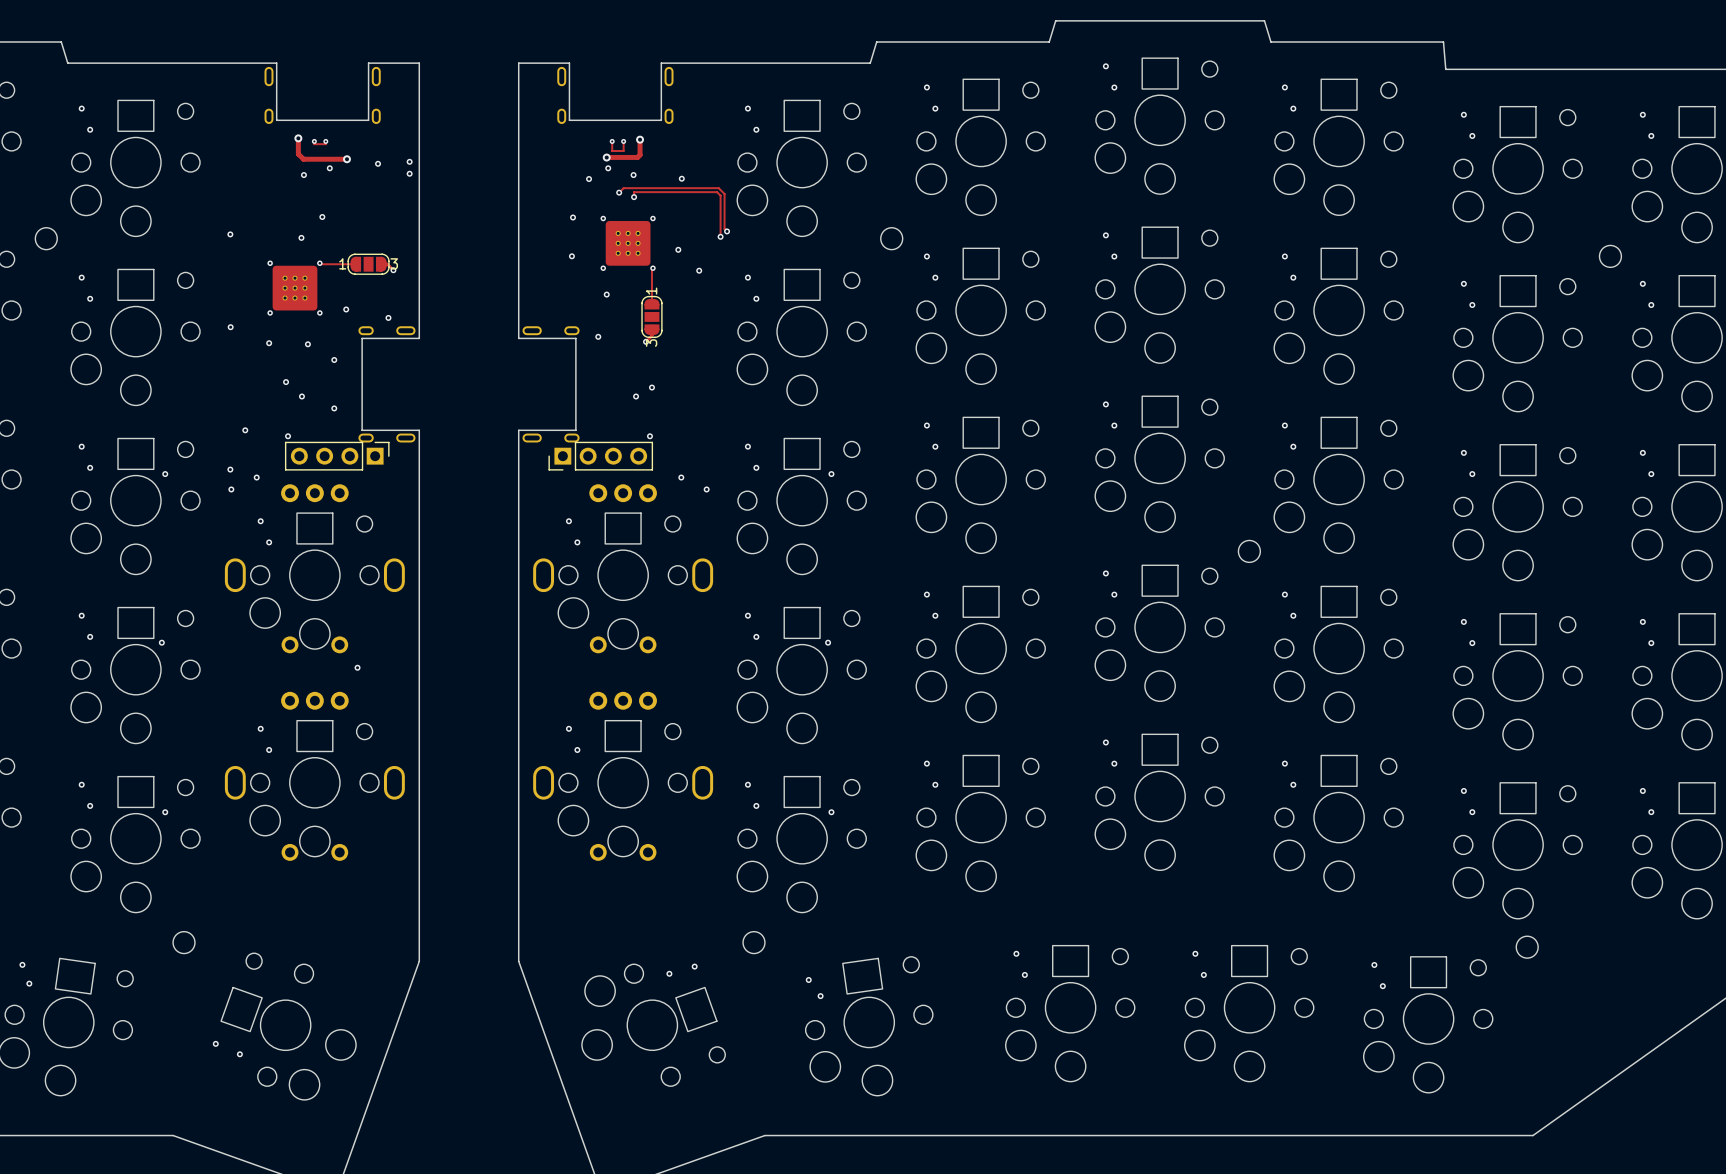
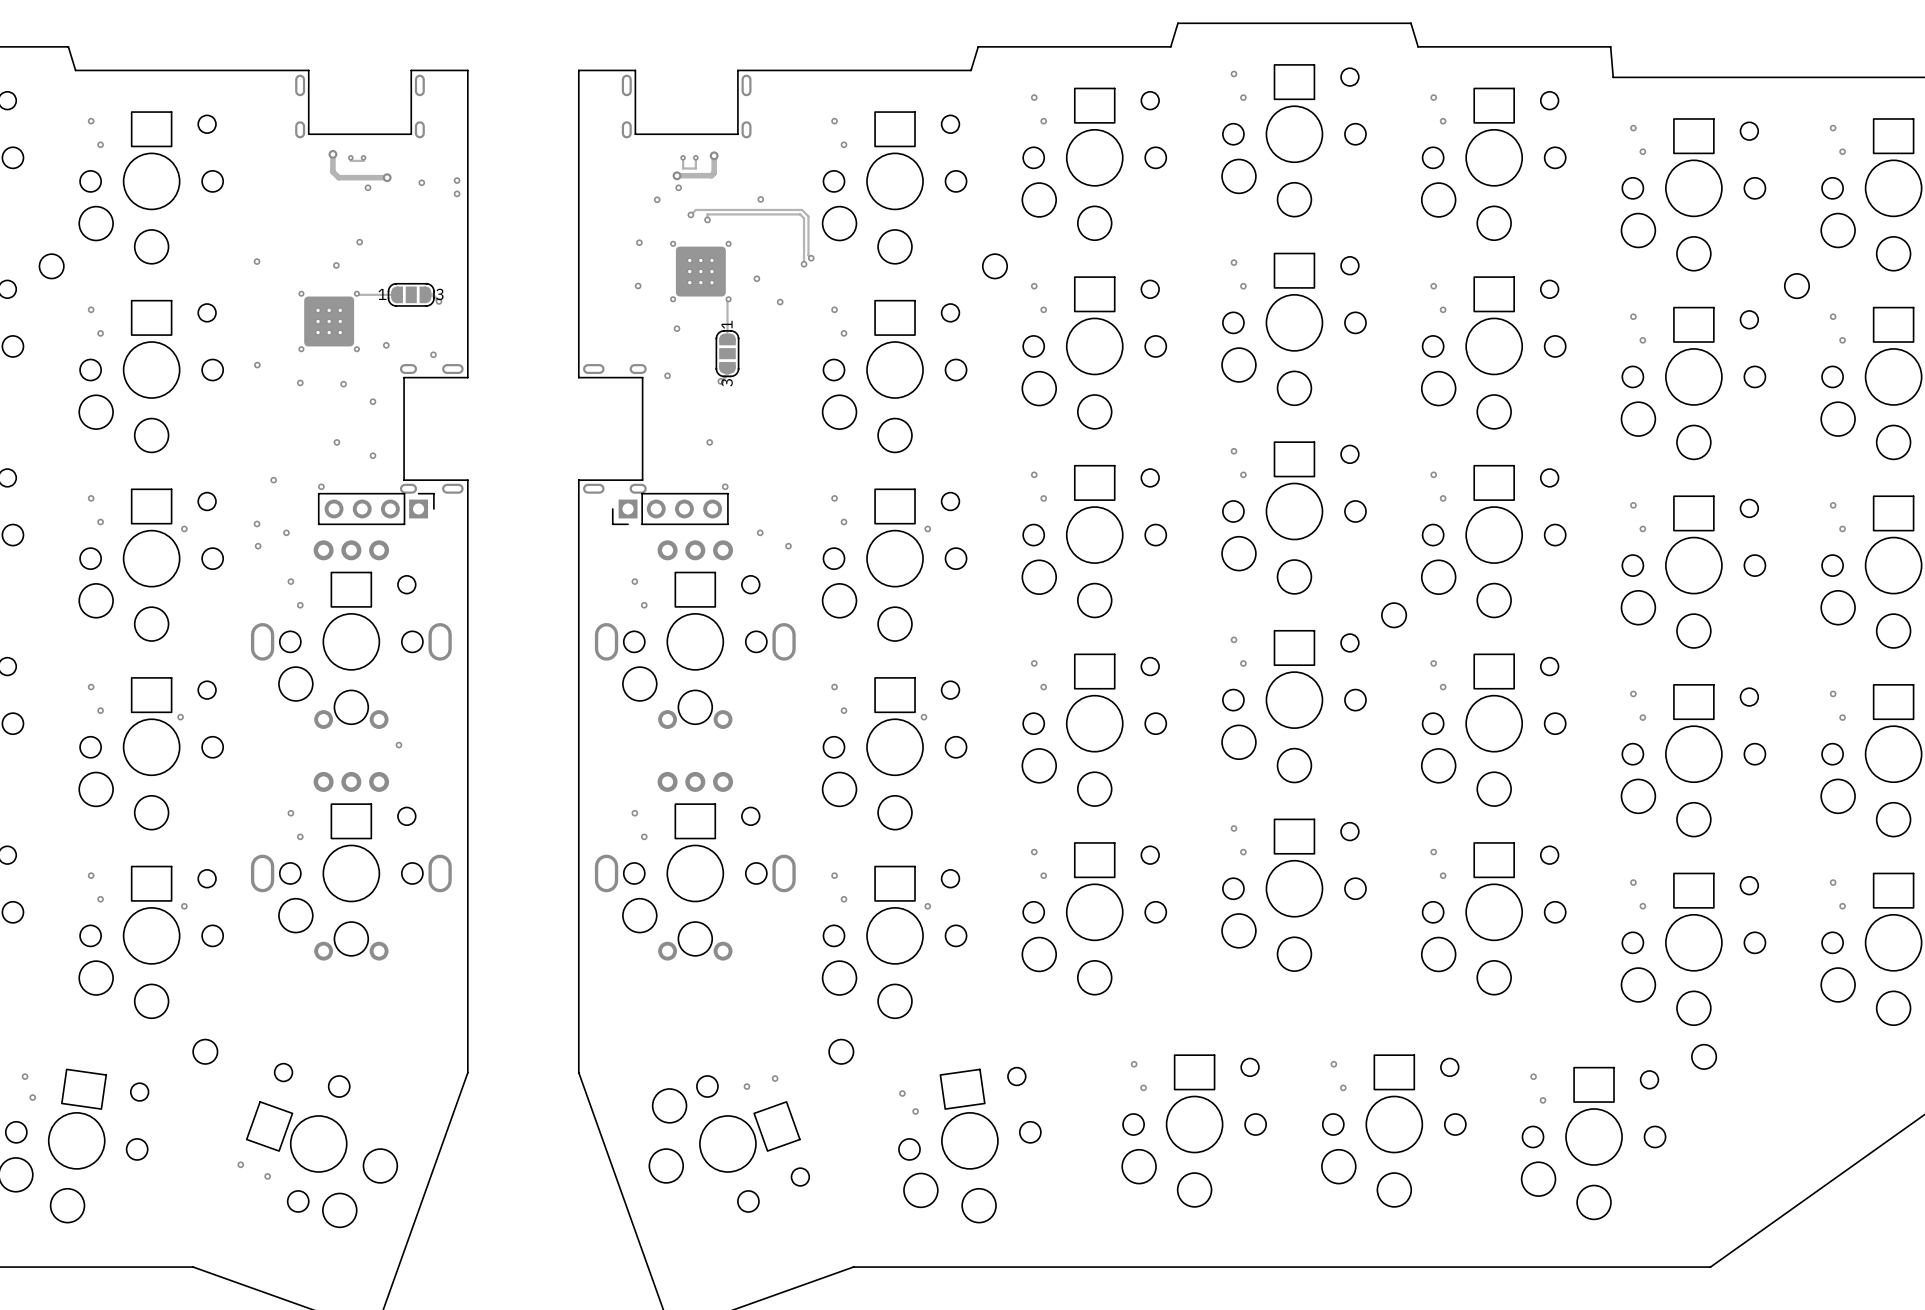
via: (303, 175) -> none
via: (633, 175) -> none
via: (286, 382) -> none
via: (651, 387) -> none

